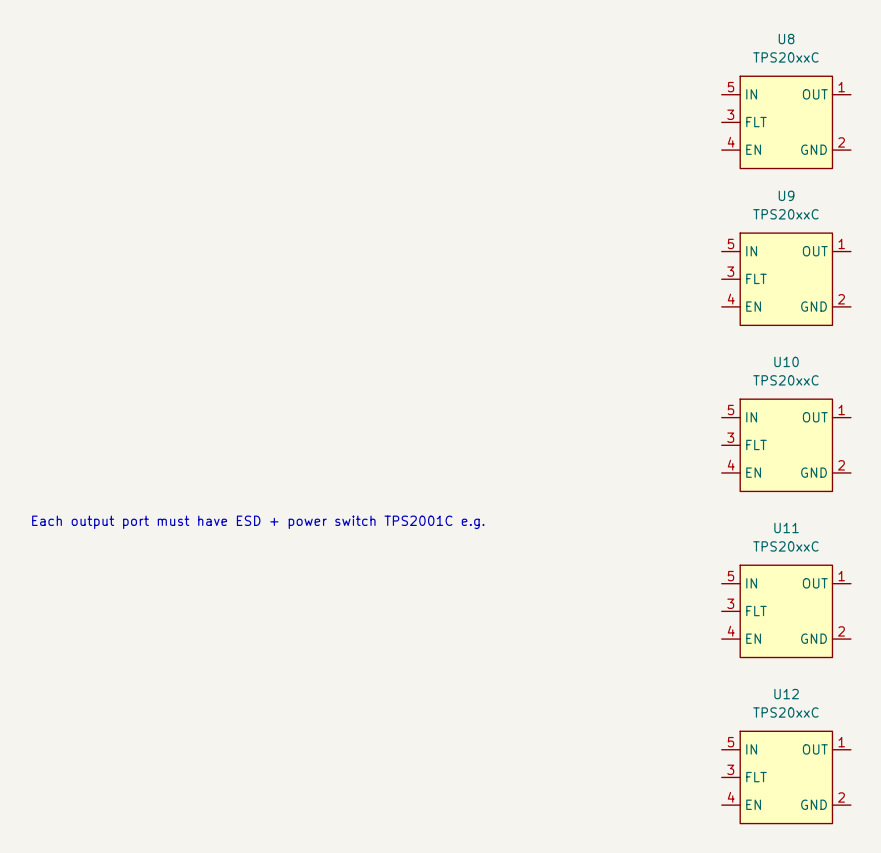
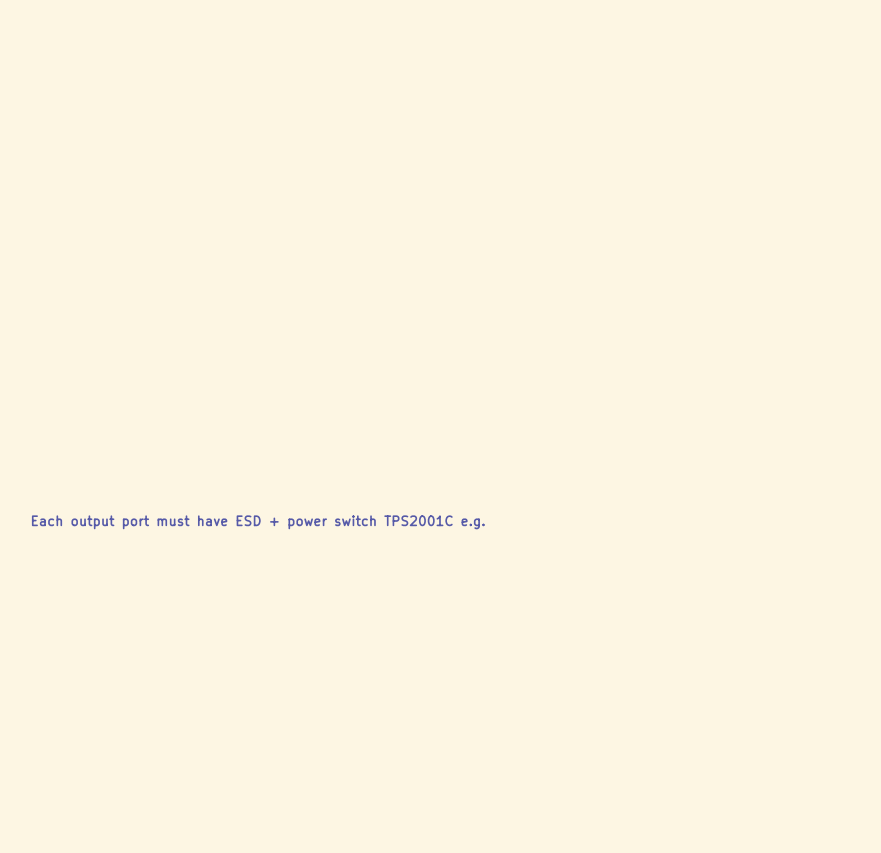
U8: TPS20xxC (786, 122) -> none
U9: TPS20xxC (786, 279) -> none
U10: TPS20xxC (786, 445) -> none
U11: TPS20xxC (786, 611) -> none
U12: TPS20xxC (786, 777) -> none

